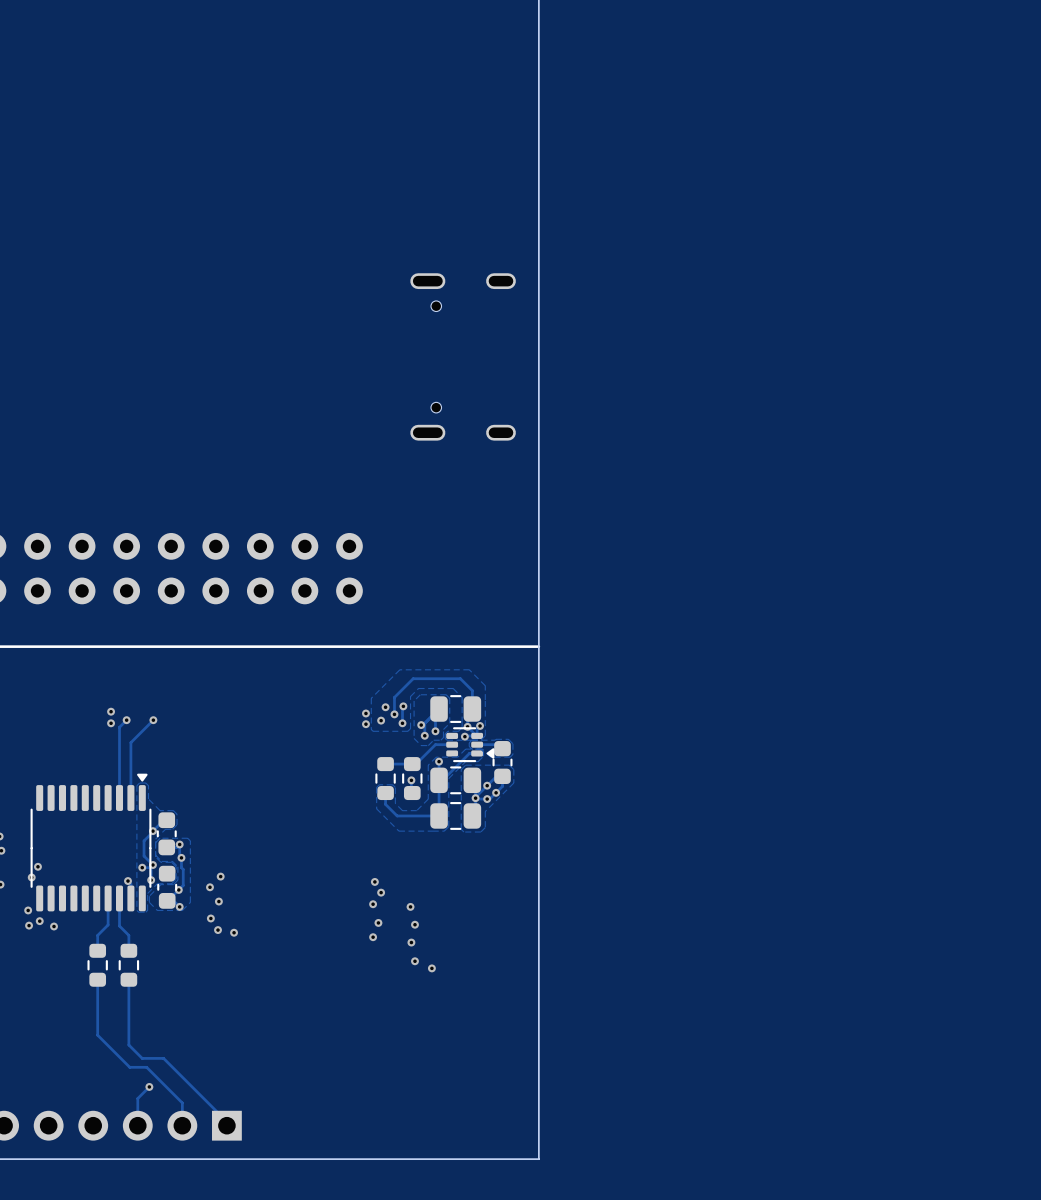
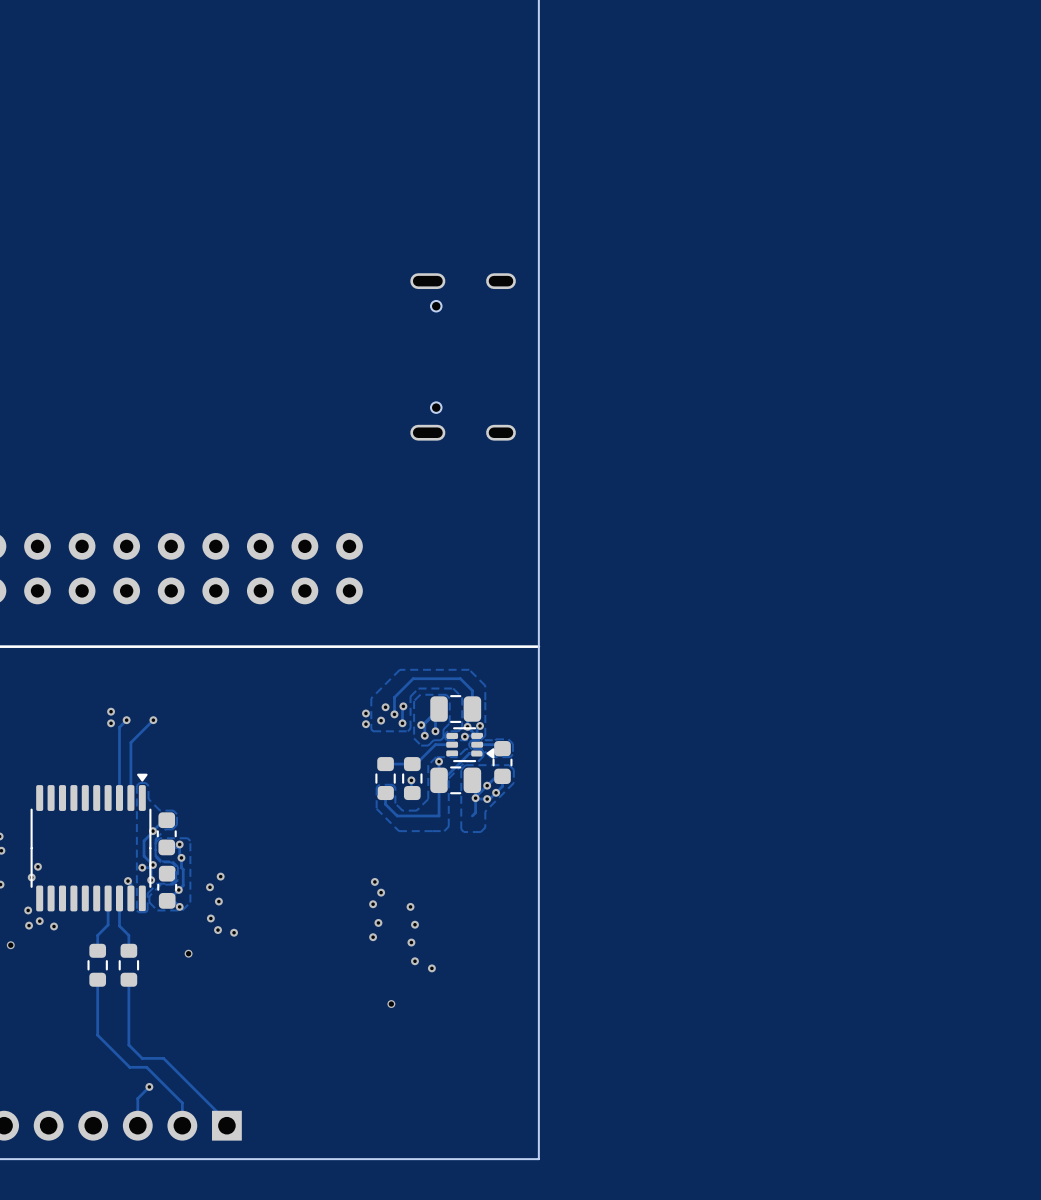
part: (455, 815) -> none
via: none -> (10, 945)
via: none -> (188, 953)
via: none -> (391, 1004)

